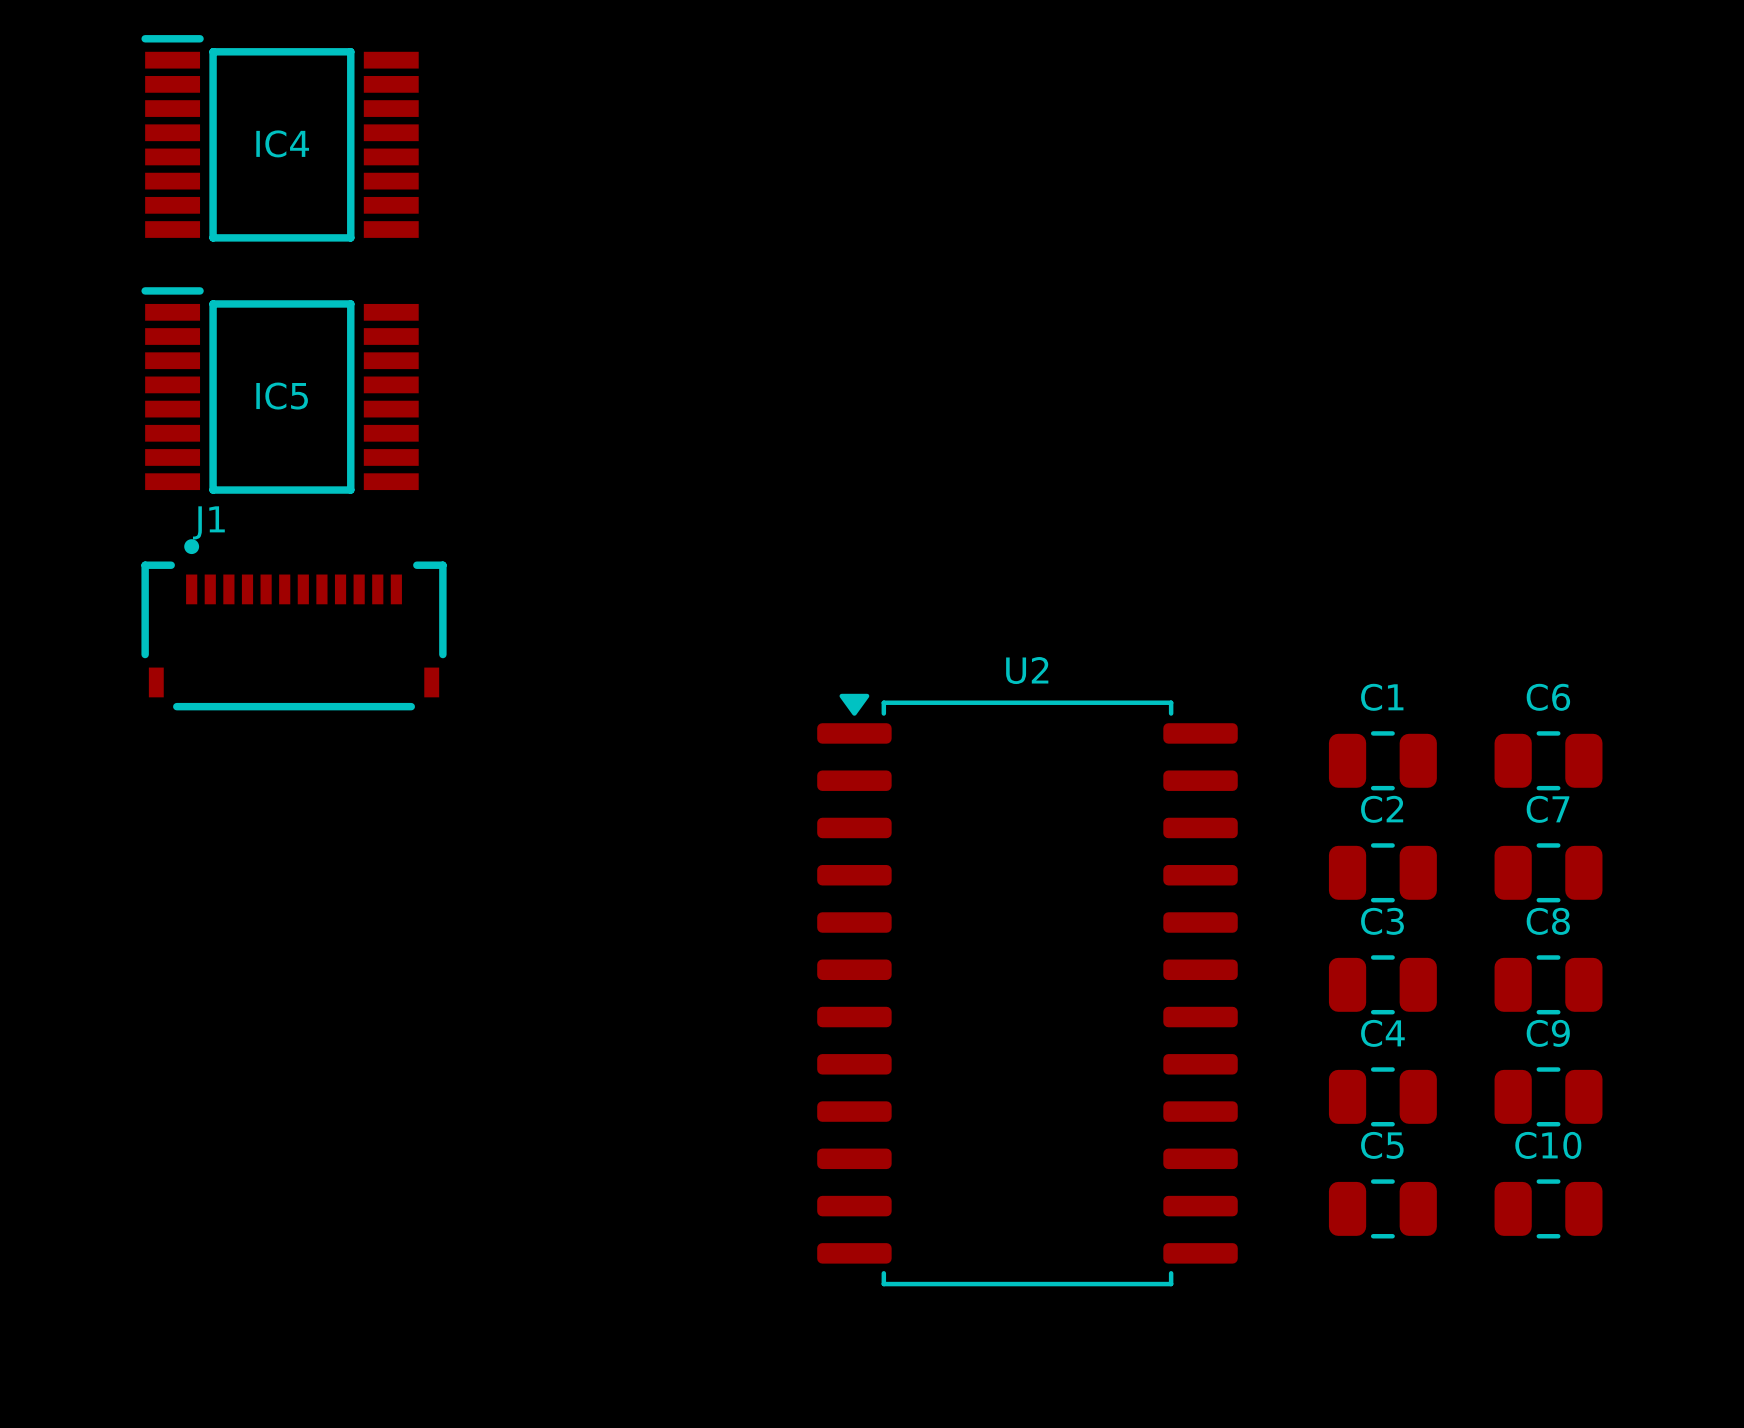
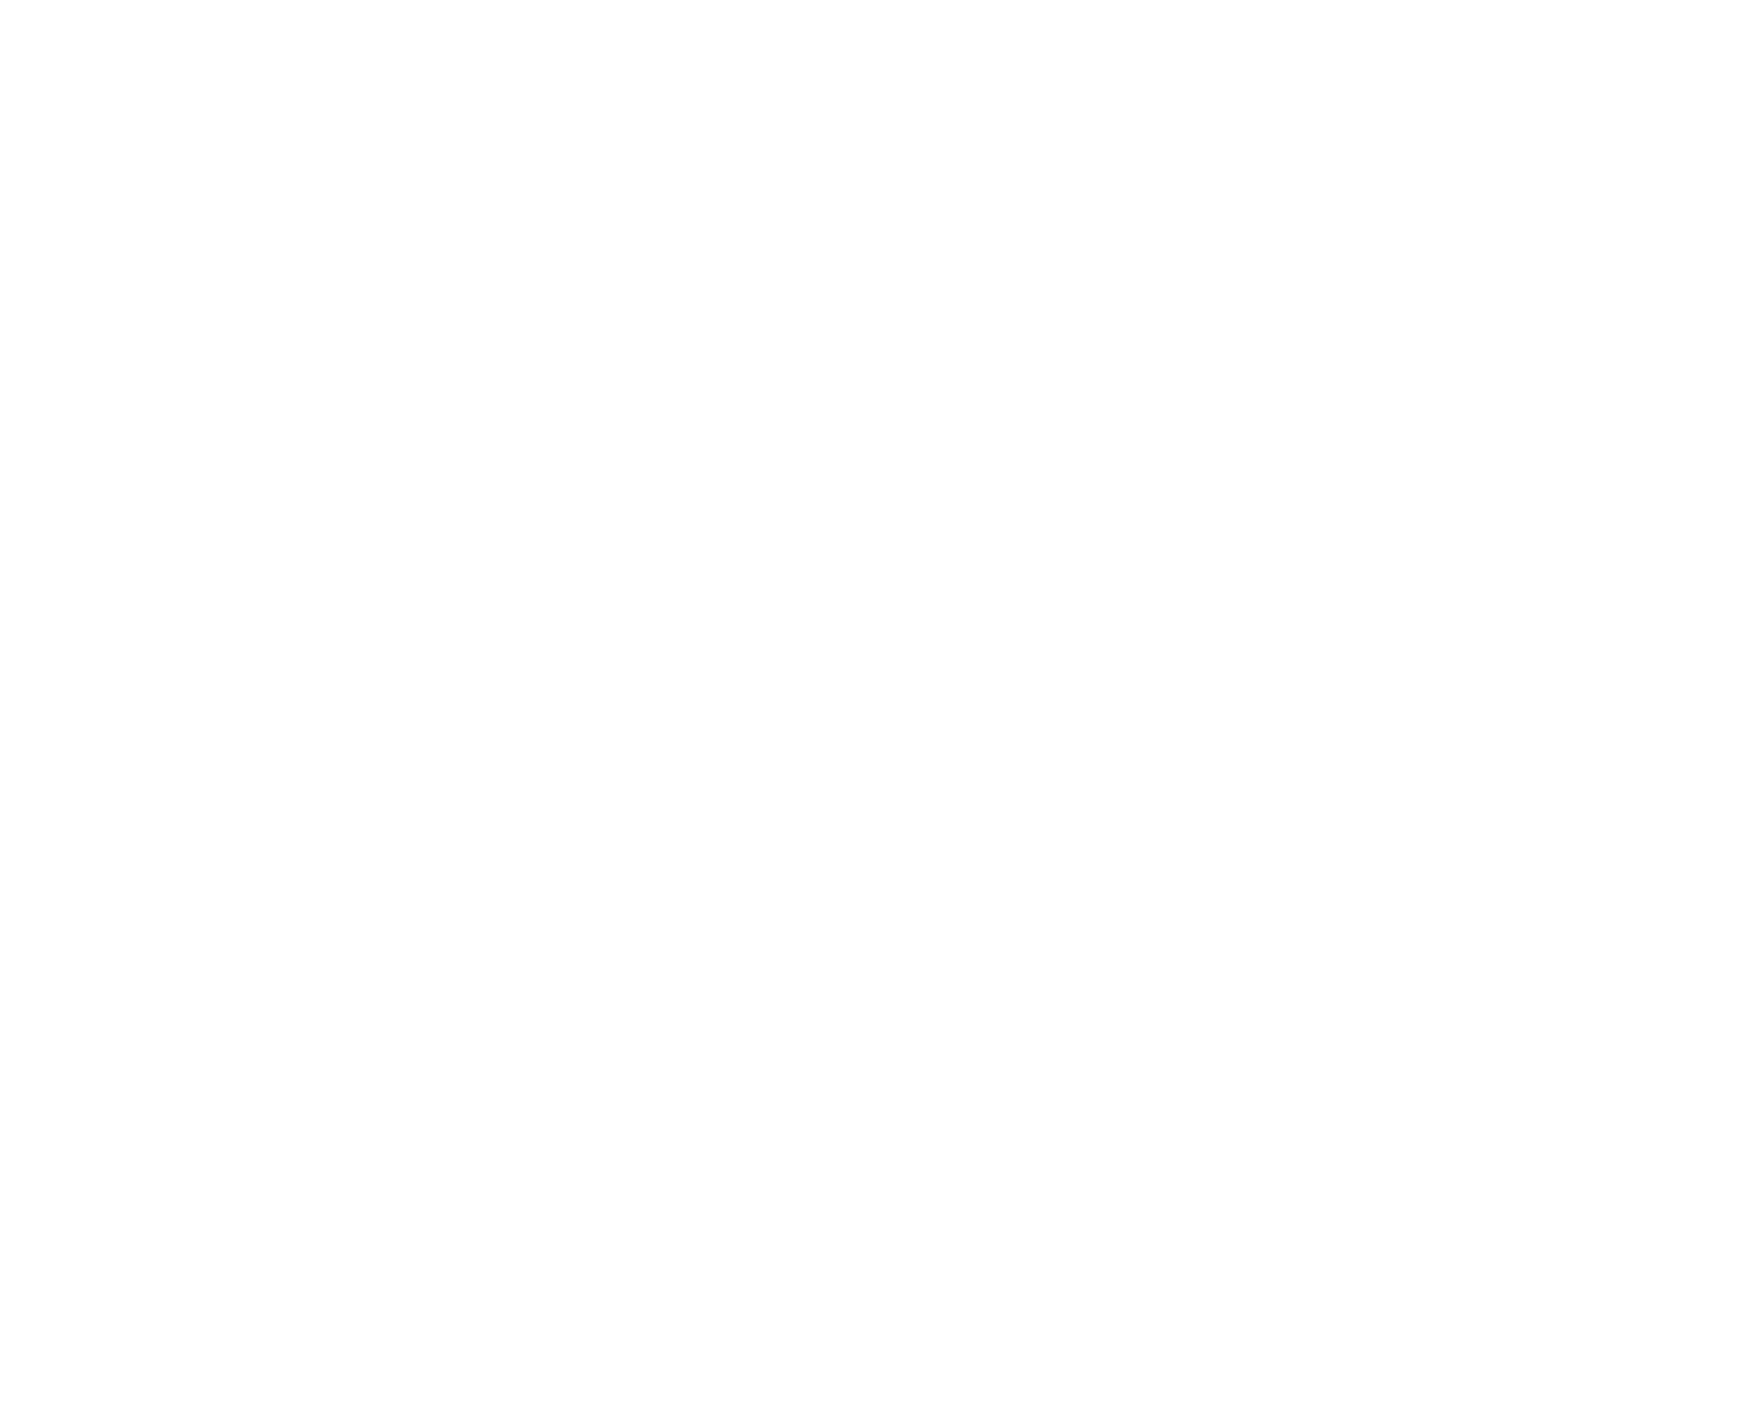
IC4: (280, 138) -> none
IC5: (280, 390) -> none
J1: (294, 624) -> none
C1: (1382, 760) -> none
C6: (1548, 760) -> none
C2: (1382, 872) -> none
C7: (1548, 872) -> none
C3: (1382, 984) -> none
C8: (1548, 984) -> none
U2: (1027, 990) -> none
C4: (1382, 1096) -> none
C9: (1548, 1096) -> none
C5: (1382, 1208) -> none
C10: (1548, 1208) -> none

